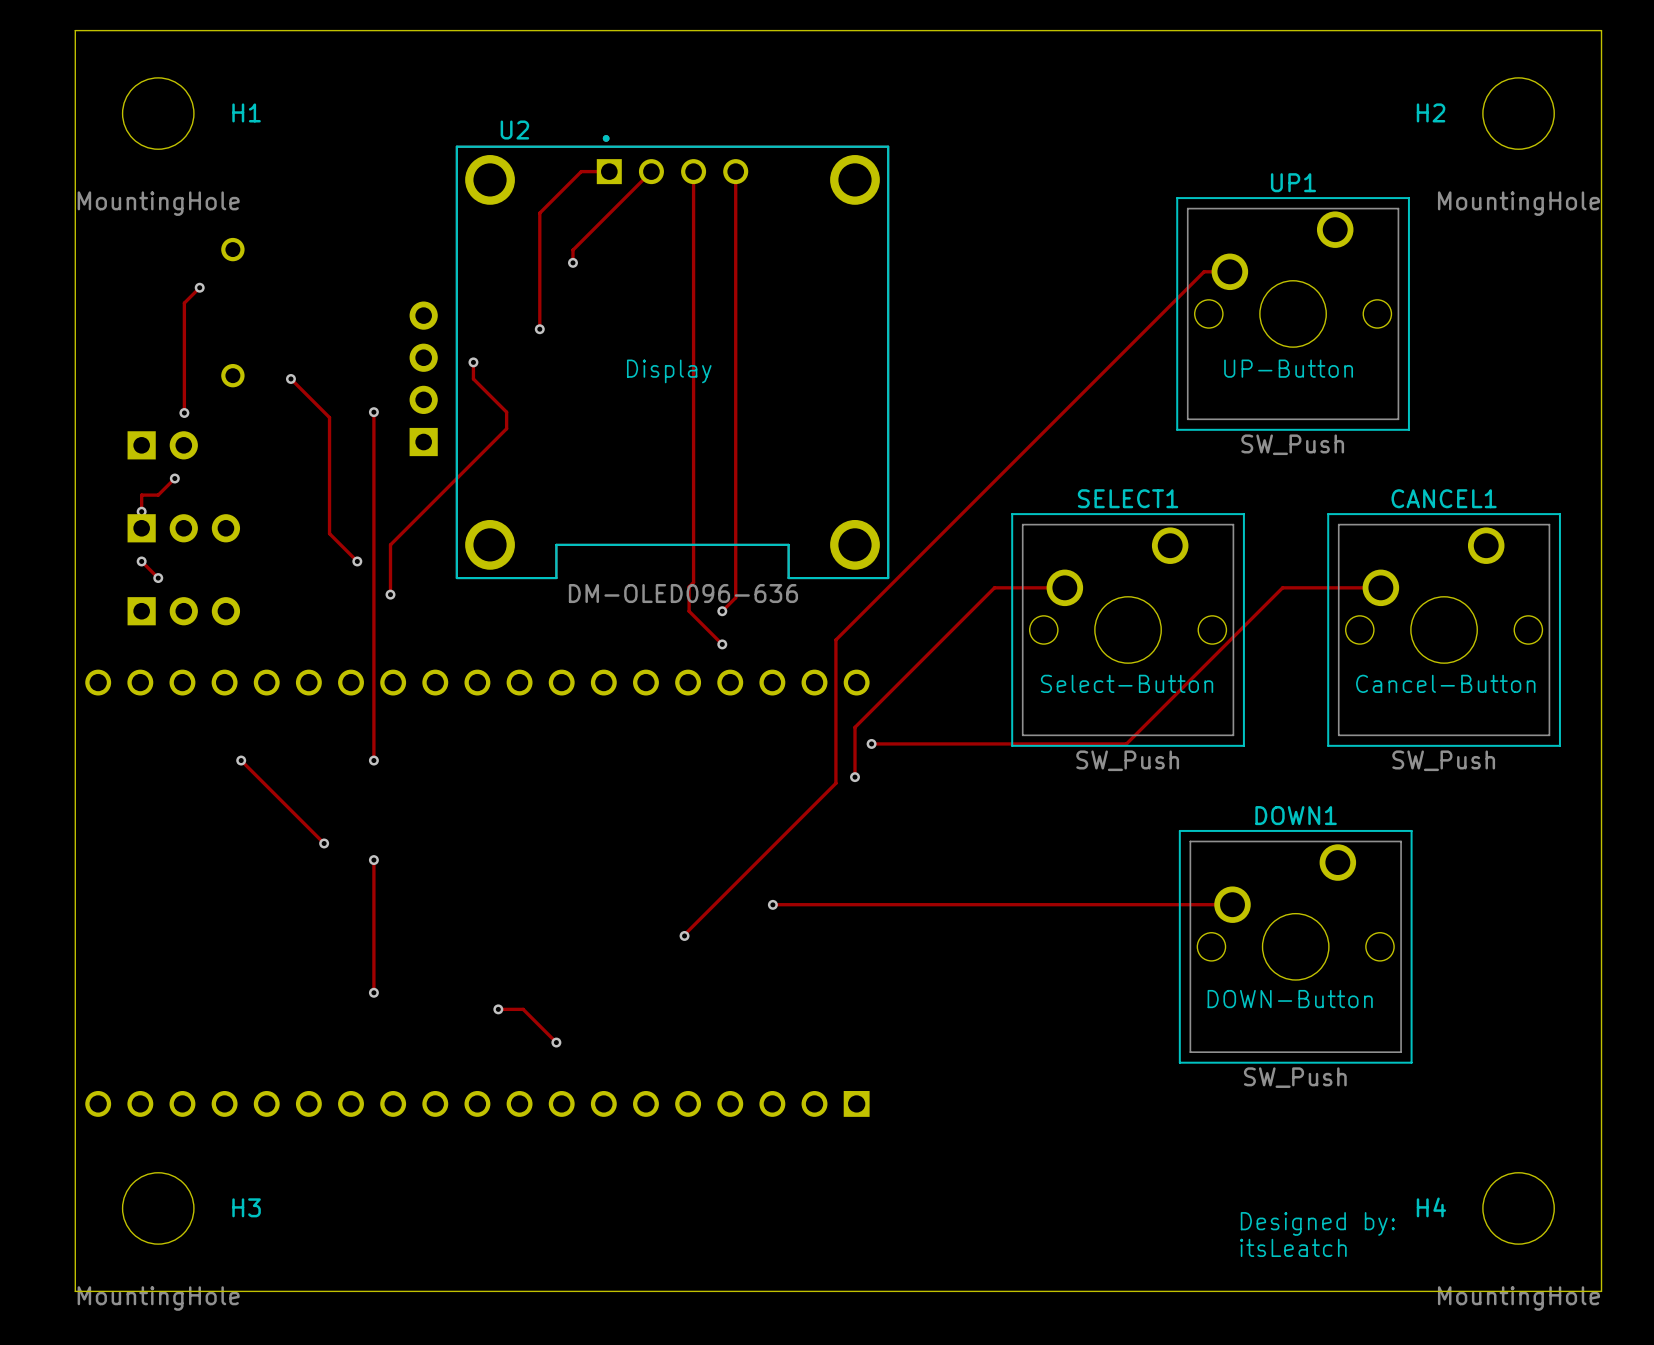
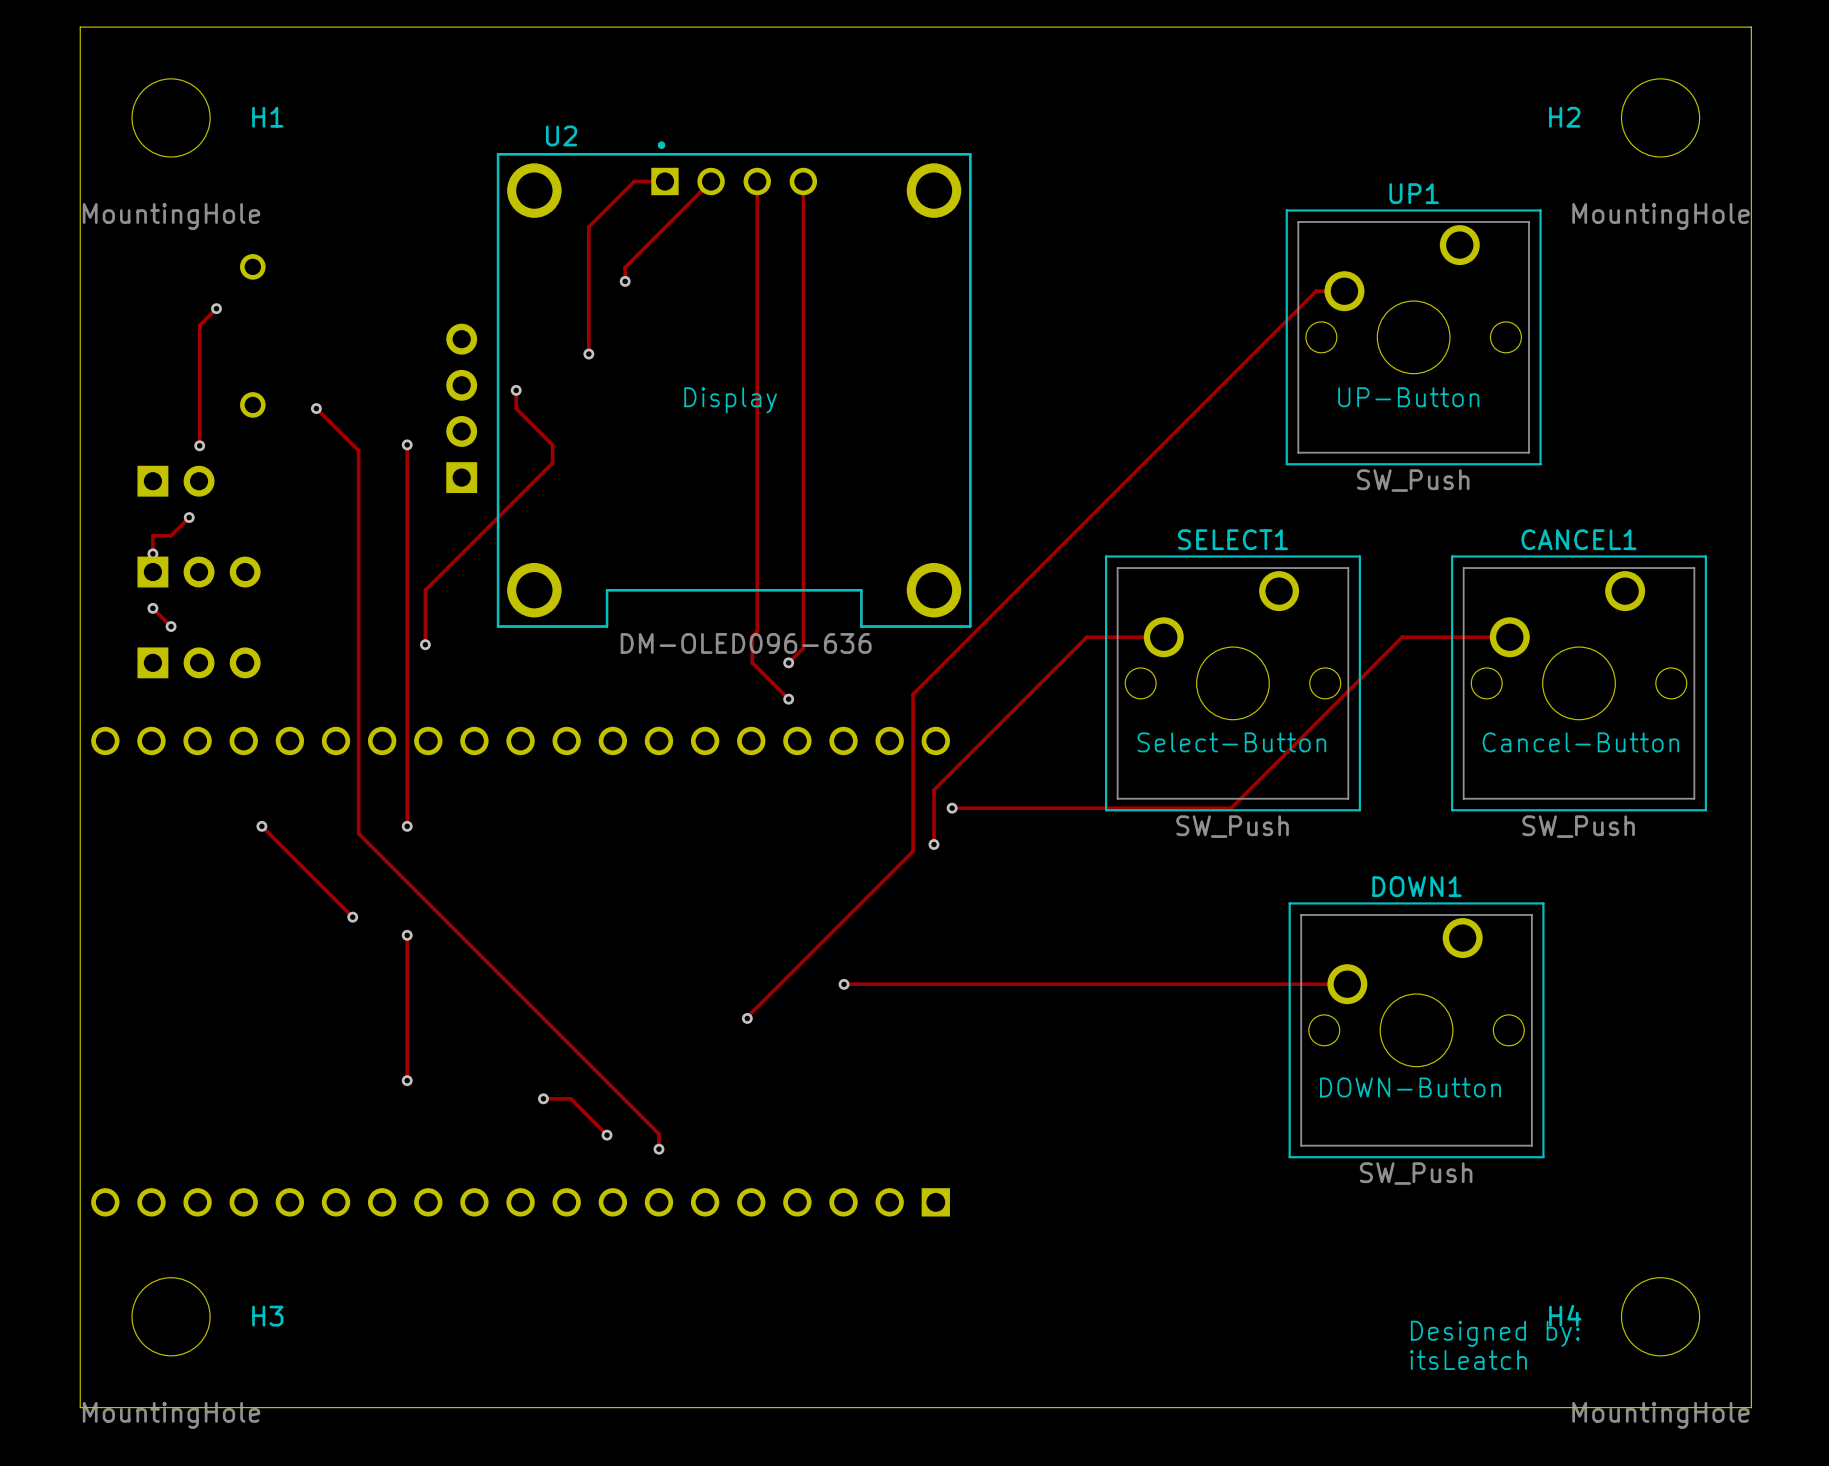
track: (329, 533) (357, 561) -> (358, 577) (358, 833) (658, 1133) (658, 1149)
via: (357, 561) -> none
via: none -> (658, 1149)
text position: Designed by: (1317, 1223) -> Designed by: (1495, 1333)
text position: itsLeatch (1293, 1247) -> itsLeatch (1468, 1359)

